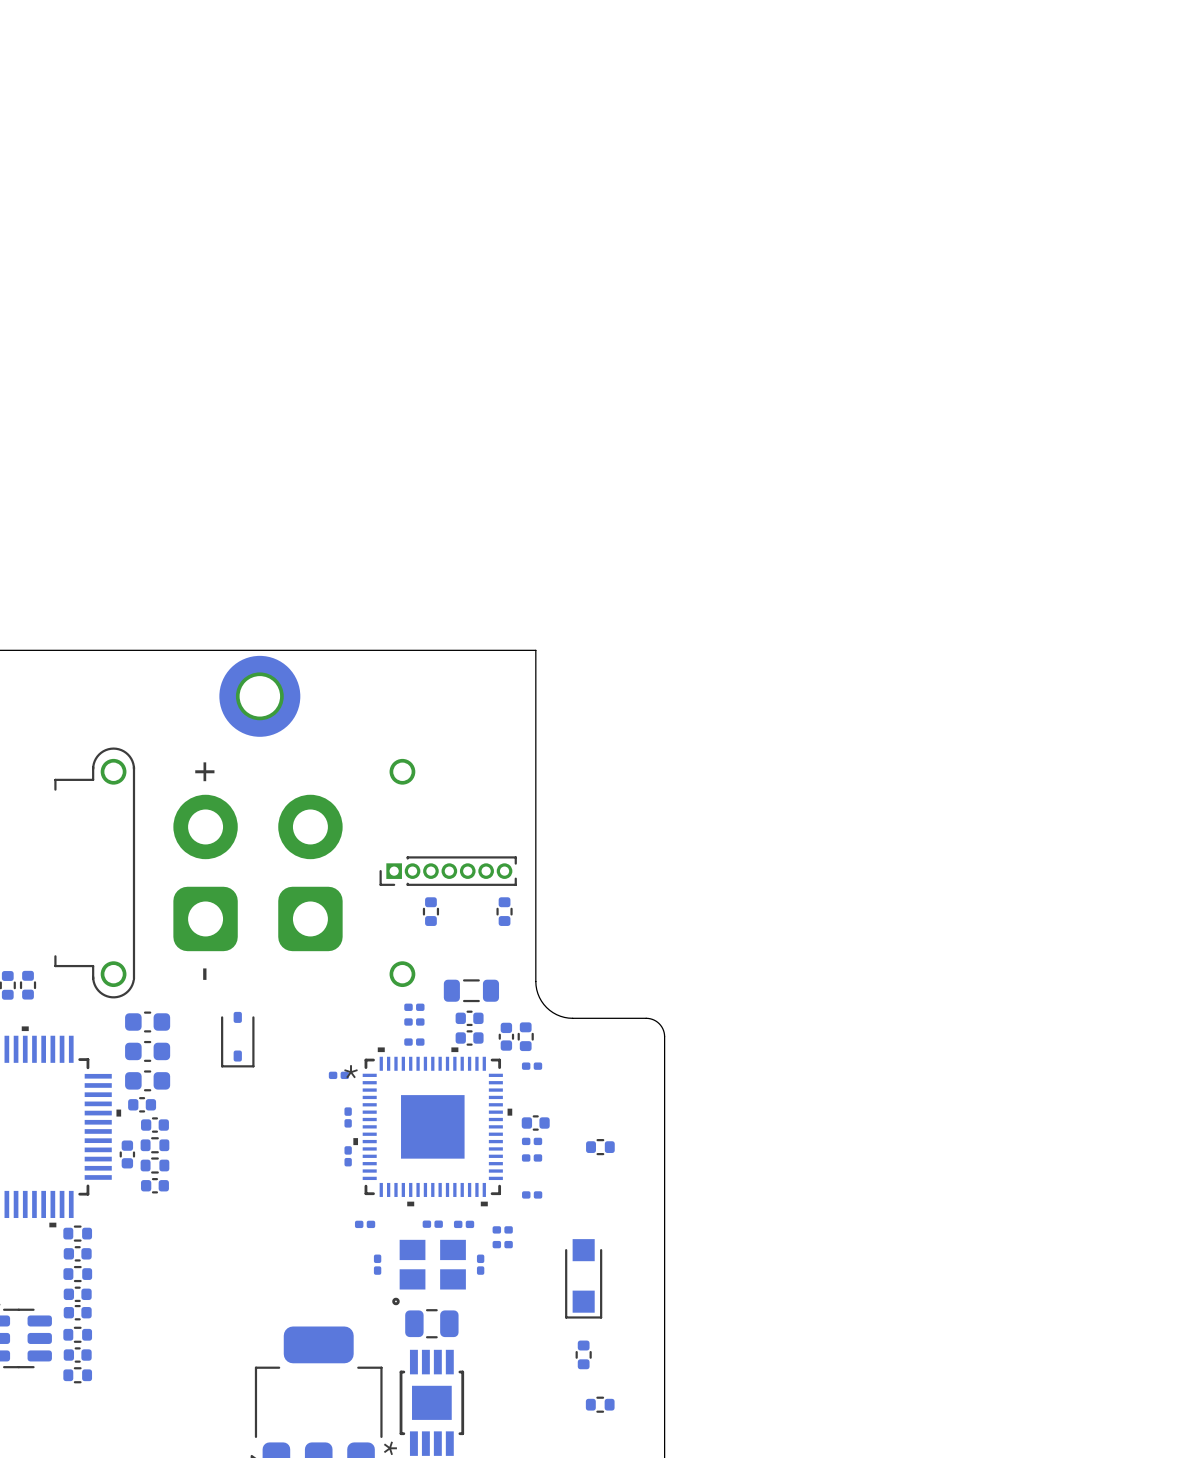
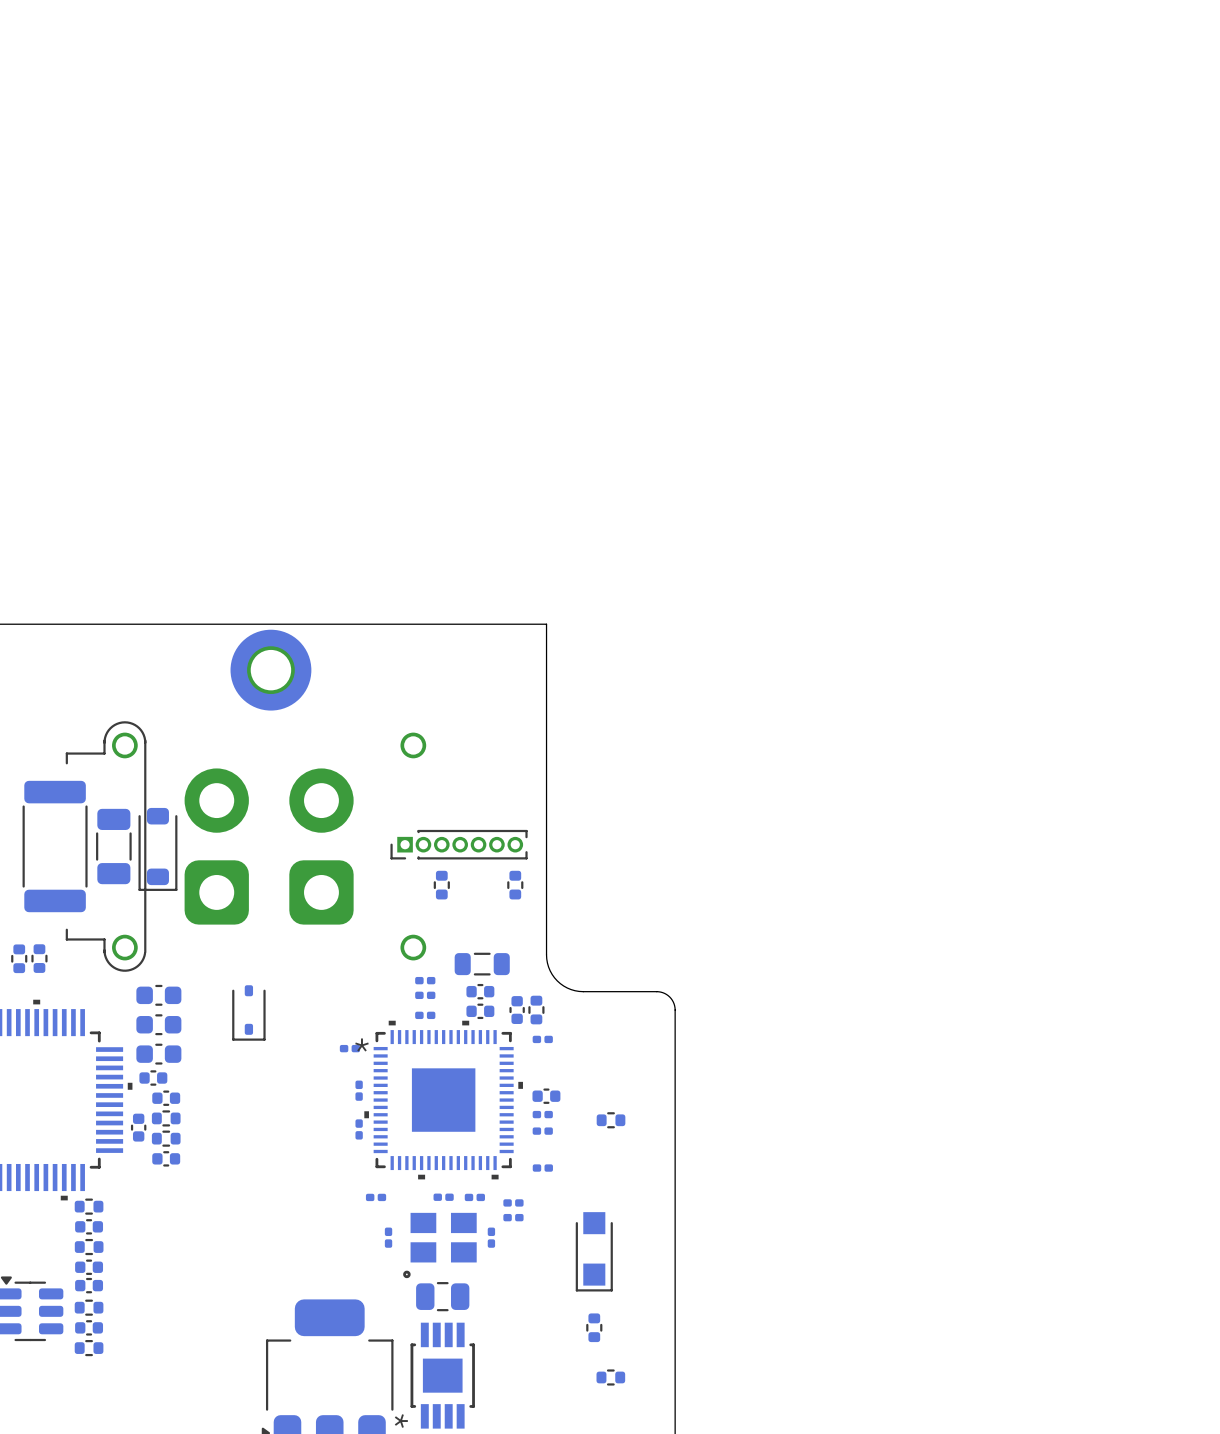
part text: + (204, 771) -> none
part: none -> (55, 846)
part: none -> (113, 846)
part: none -> (157, 849)
text: - (204, 974) -> none

